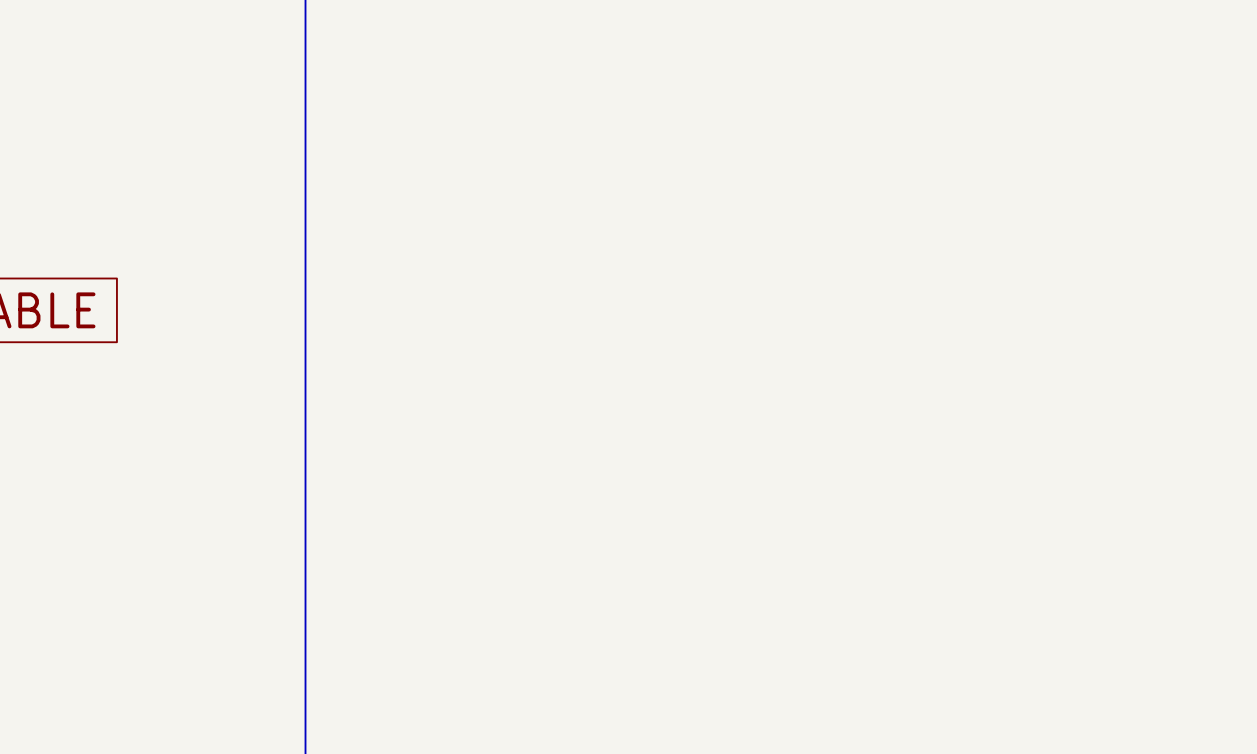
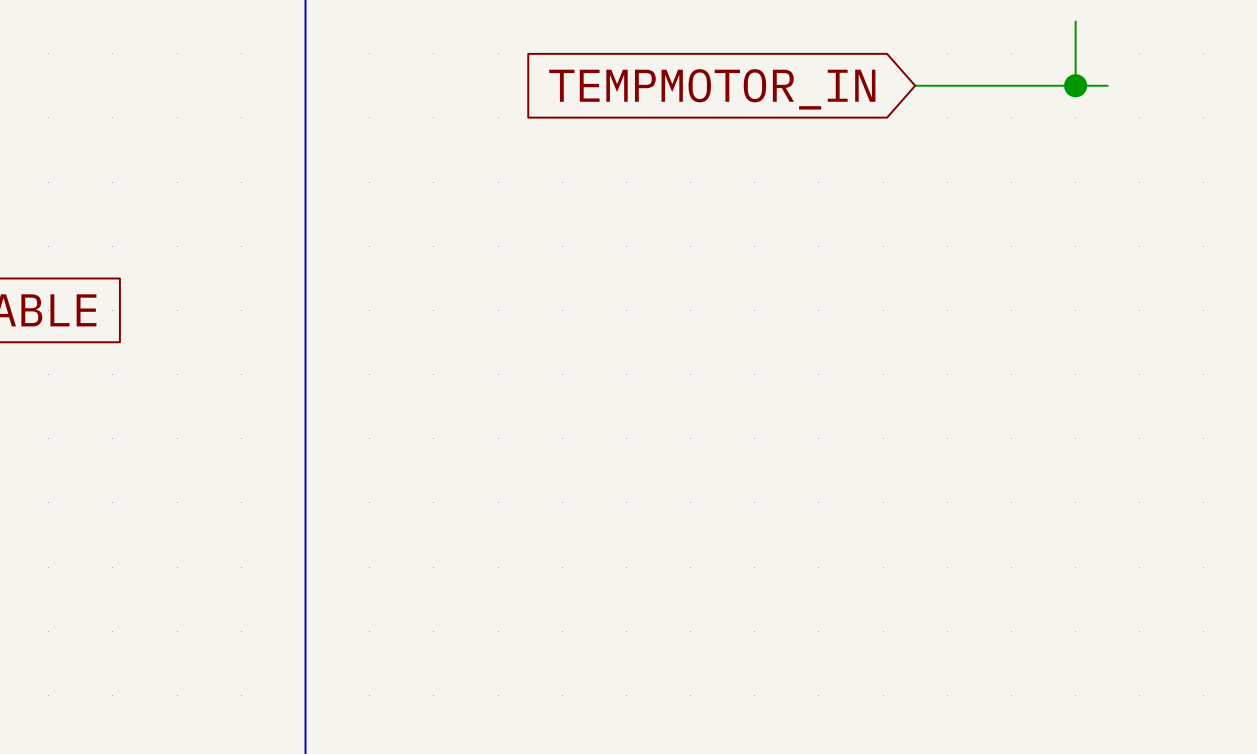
wire: none -> (1075, 21) (1075, 85)
wire: none -> (915, 85) (1107, 85)
junction: none -> (1075, 85)
global label: none -> TEMPMOTOR_IN (712, 89)

